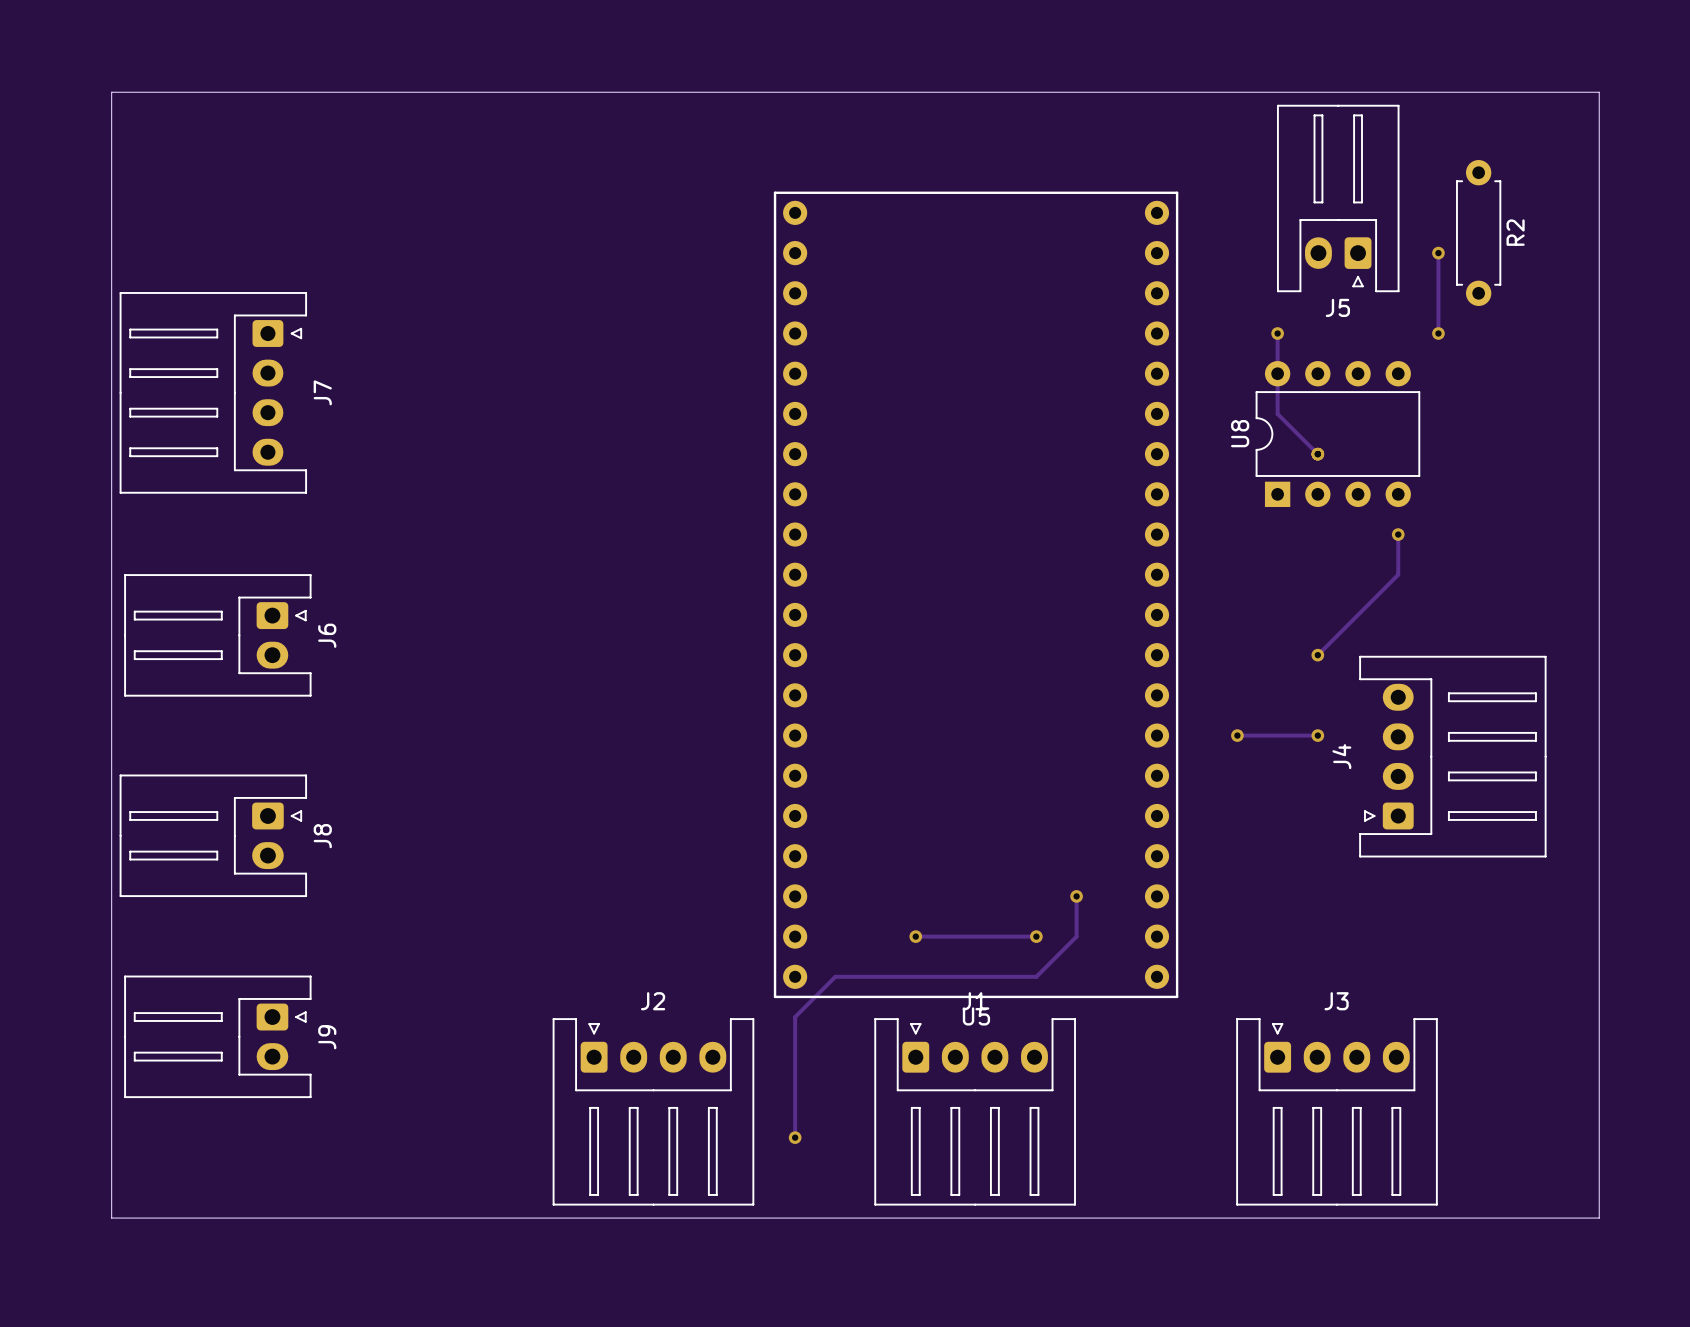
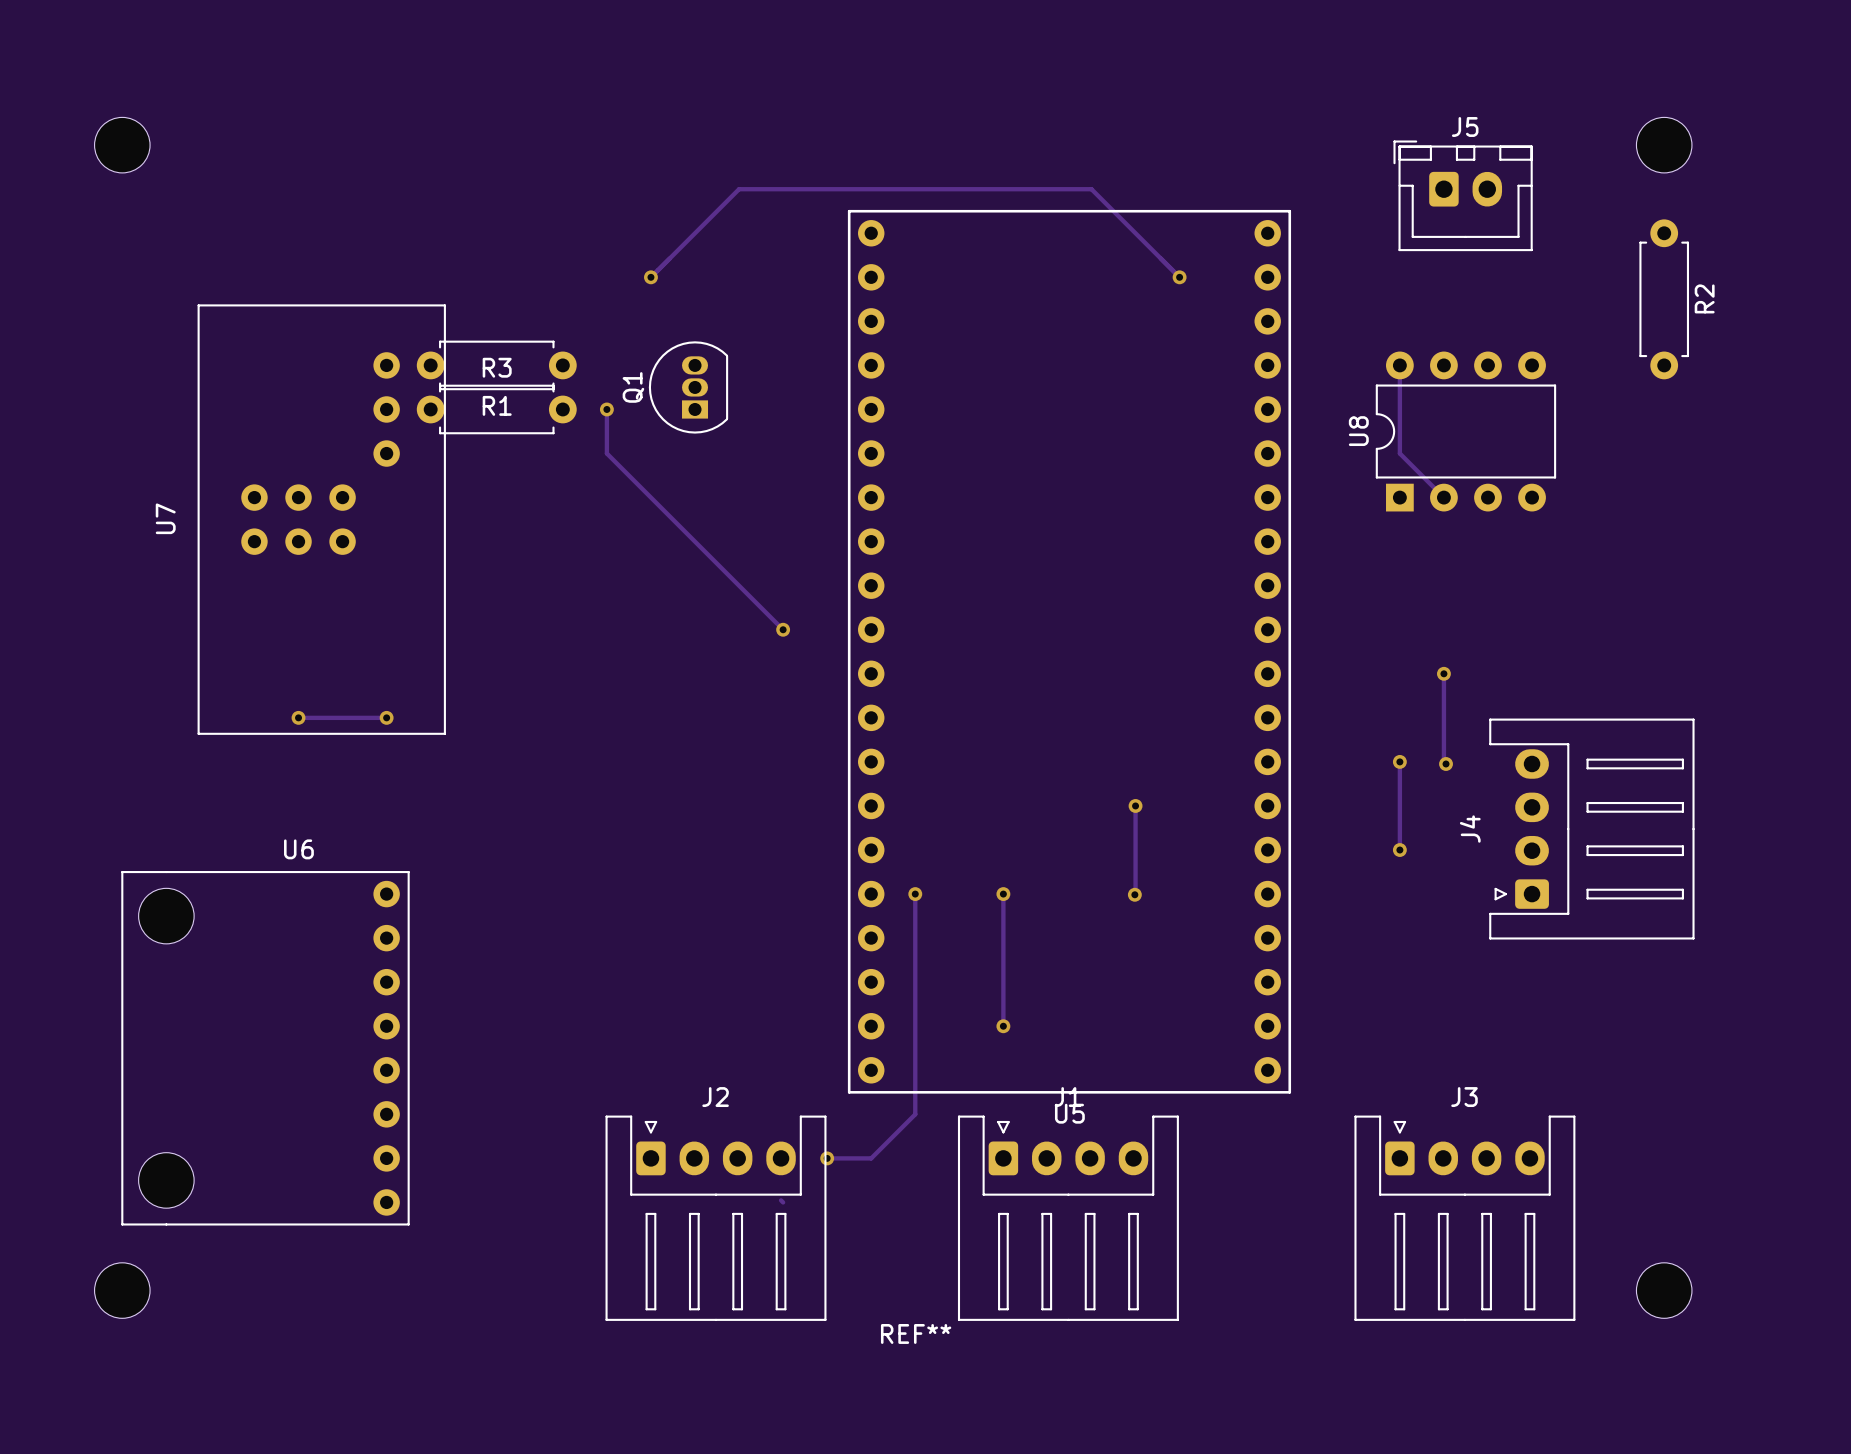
board edge: (111, 92) (1599, 92) (1599, 1218) (111, 1218) (111, 92) -> none
J5 footprint: [1276, 104, 1400, 293] -> [1393, 140, 1533, 252]
R2 position: (1478, 232) -> (1664, 299)
track: none -> (650, 277) (739, 189) (1091, 189) (1179, 277)
via: none -> (650, 277)
via: none -> (1179, 277)
track: (1438, 253) (1438, 333) -> none
via: (1438, 253) -> none
J5 name position: J5 (1337, 307) -> J5 (1465, 126)
R1: none -> (496, 365)
via: (1438, 333) -> none
Q1: none -> (688, 387)
R3: none -> (496, 409)
track: none -> (606, 409) (606, 453) (783, 629)
via: none -> (606, 409)
J7: (213, 392) -> none
U8 position: (1337, 434) -> (1465, 431)
U7: none -> (321, 519)
track: (1398, 534) (1398, 574) (1317, 655) -> none
via: (1398, 534) -> none
via: none -> (783, 629)
track: none -> (1443, 673) (1443, 761) (1446, 763)
via: none -> (1443, 673)
J6: (217, 635) -> none
track: none -> (298, 717) (386, 717)
via: none -> (298, 717)
via: none -> (386, 717)
REF**: none -> (893, 717)
via: (1317, 655) -> none
track: none -> (1399, 761) (1399, 850)
via: none -> (1399, 761)
via: none -> (1446, 763)
track: none -> (1135, 805) (1134, 894)
via: none -> (1135, 805)
track: (1237, 735) (1317, 735) -> none
via: (1237, 735) -> none
via: (1317, 735) -> none
via: none -> (1399, 850)
track: none -> (915, 894) (915, 1114) (871, 1158) (827, 1158)
via: none -> (915, 894)
via: none -> (1003, 894)
via: none -> (1134, 894)
J8: (213, 835) -> none
track: (1076, 896) (1076, 936) (1036, 976) (835, 976) (795, 1017) (795, 1137) -> none
via: (1076, 896) -> none
track: (915, 936) (1036, 936) -> (1003, 1026) (1003, 894)
via: (1036, 936) -> none
U6: none -> (265, 1048)
J9: (217, 1036) -> none
track: none -> (781, 1200) (783, 1202)
via position: (795, 1137) -> (827, 1158)

